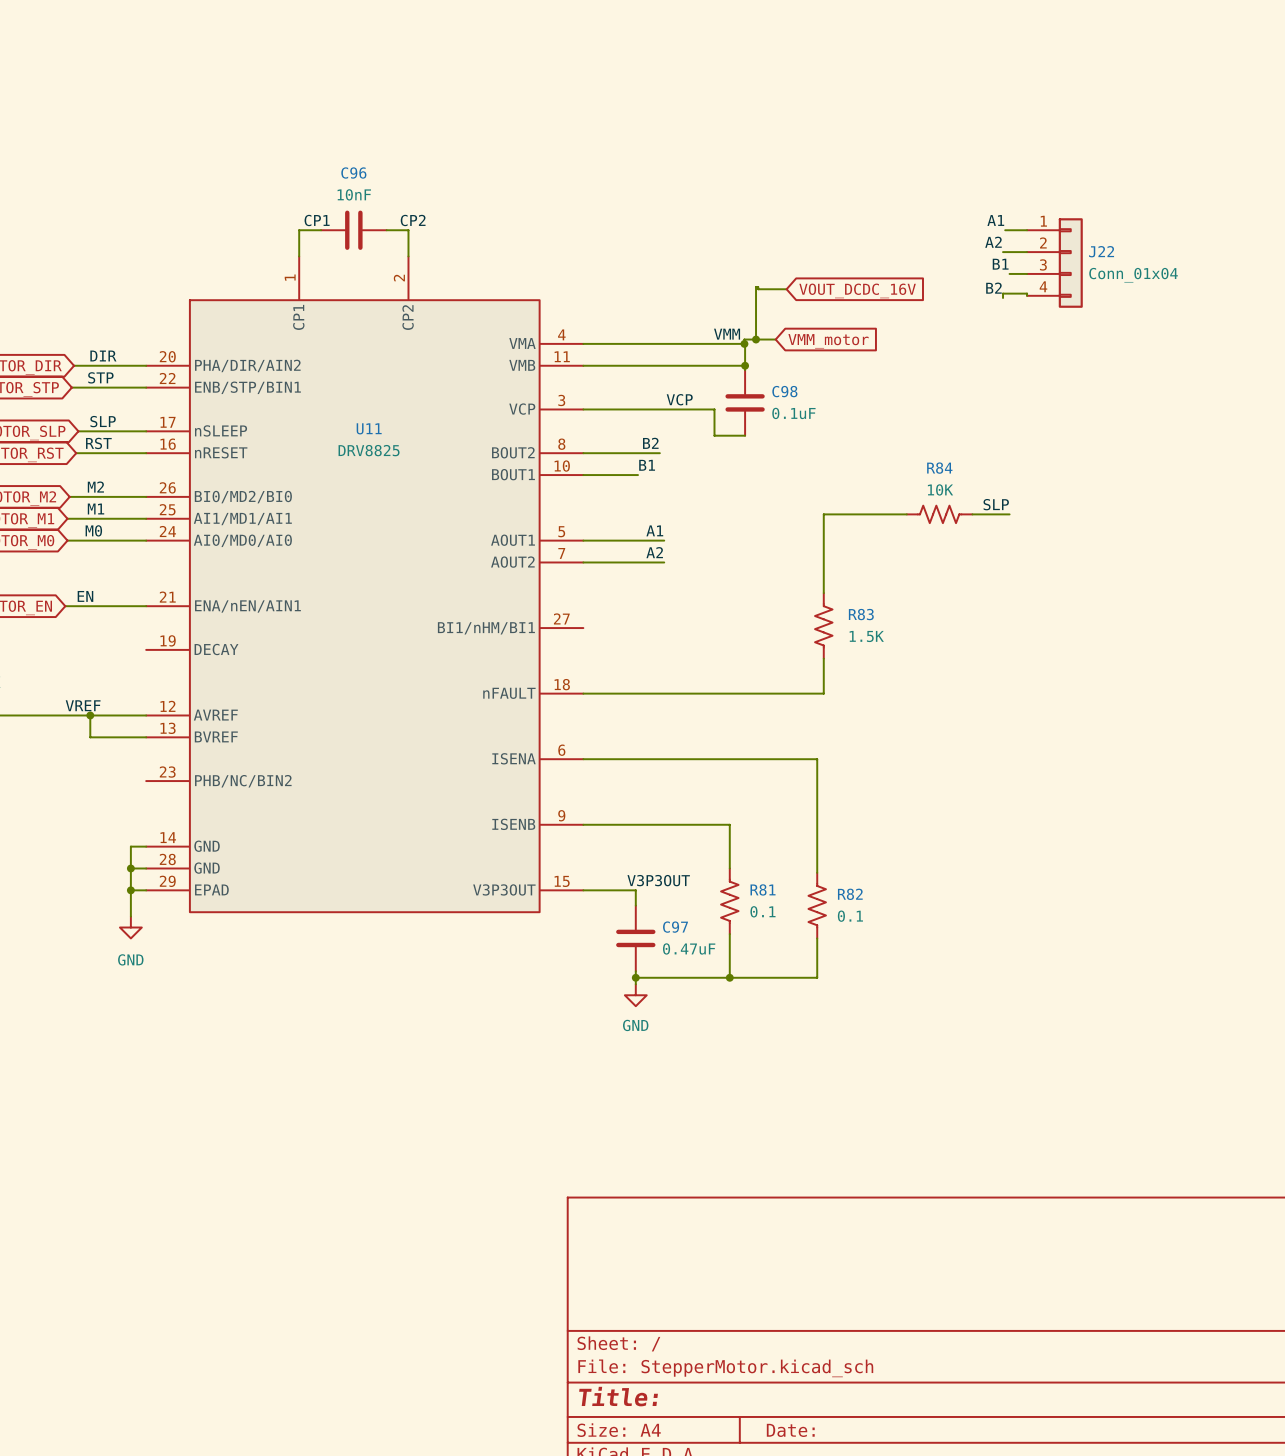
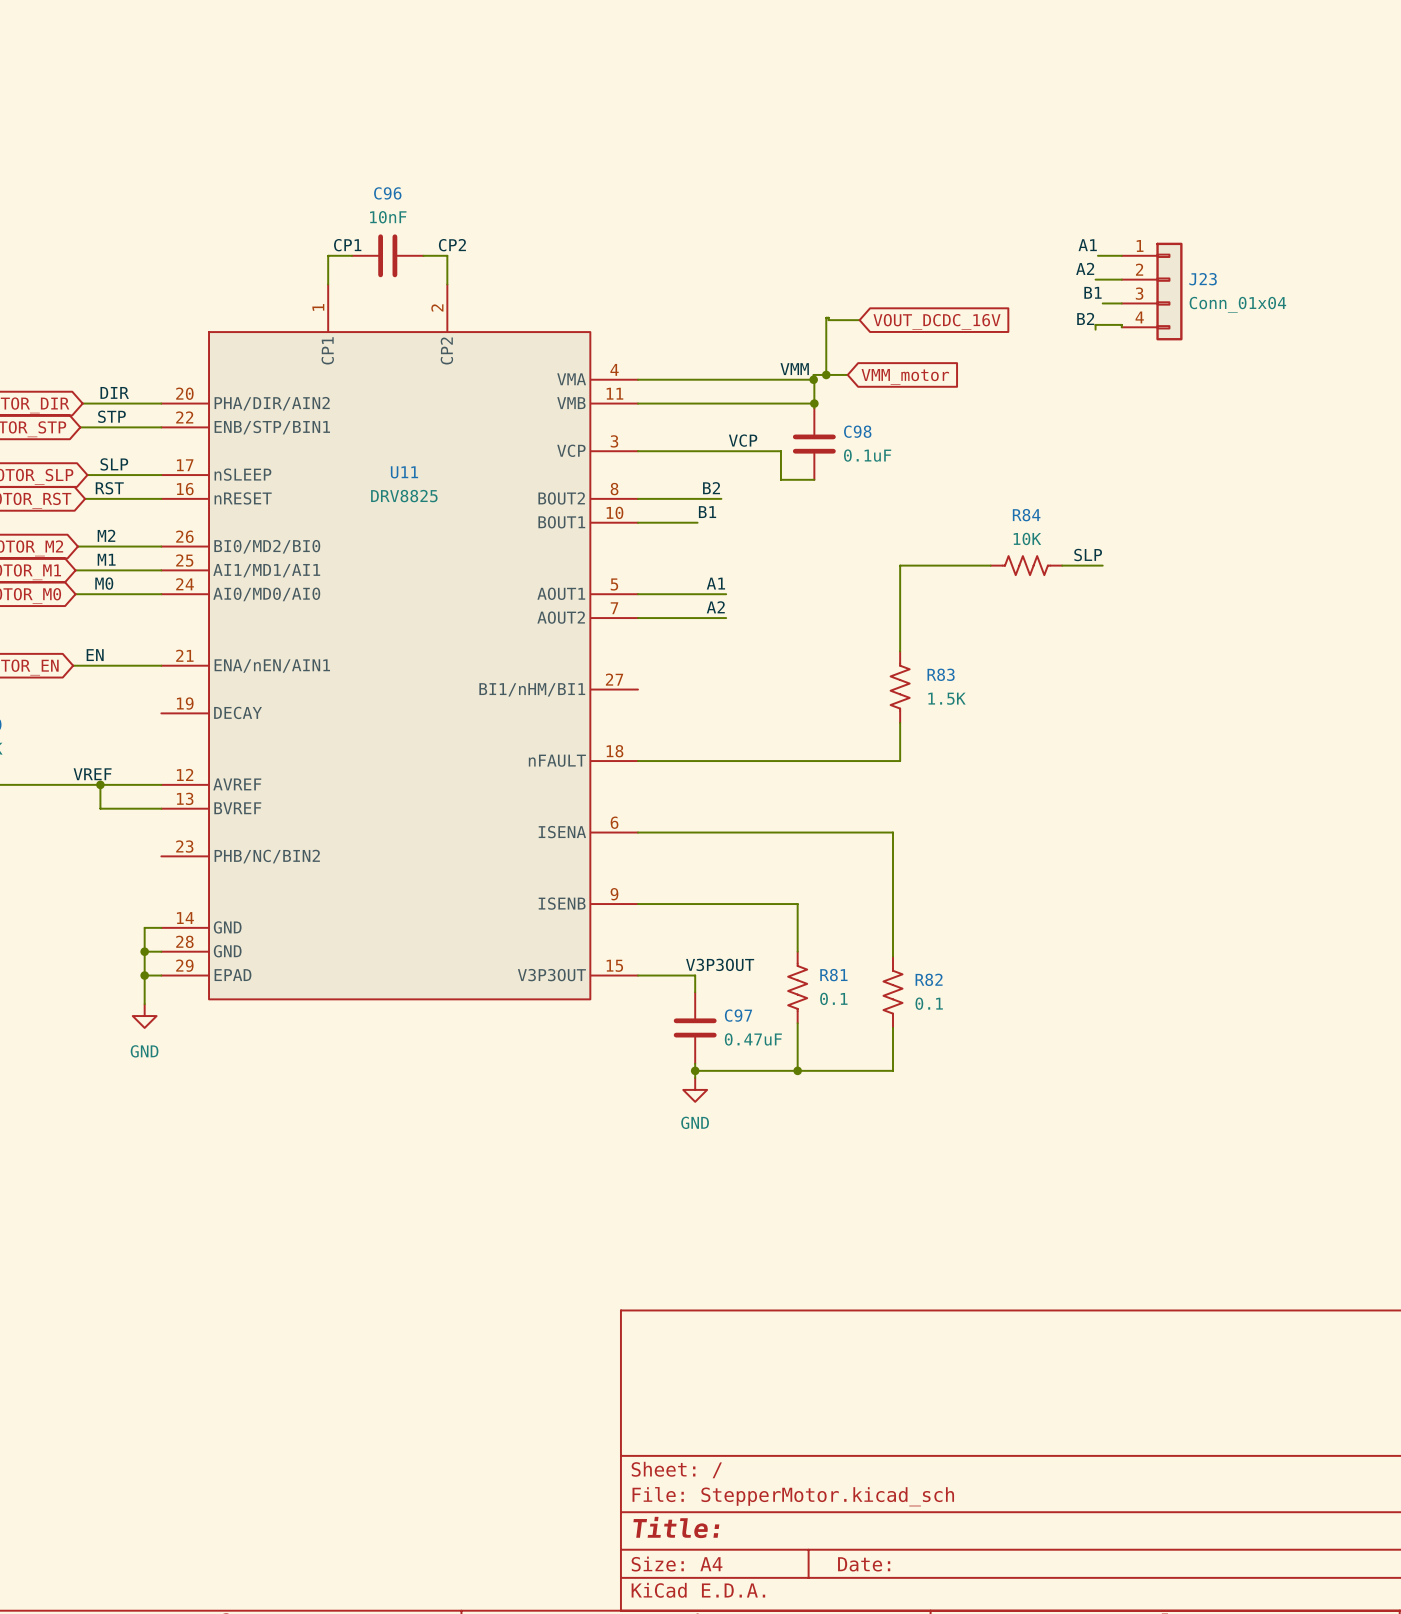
J22 name: J22 (1101, 251) -> J23 (1203, 279)

